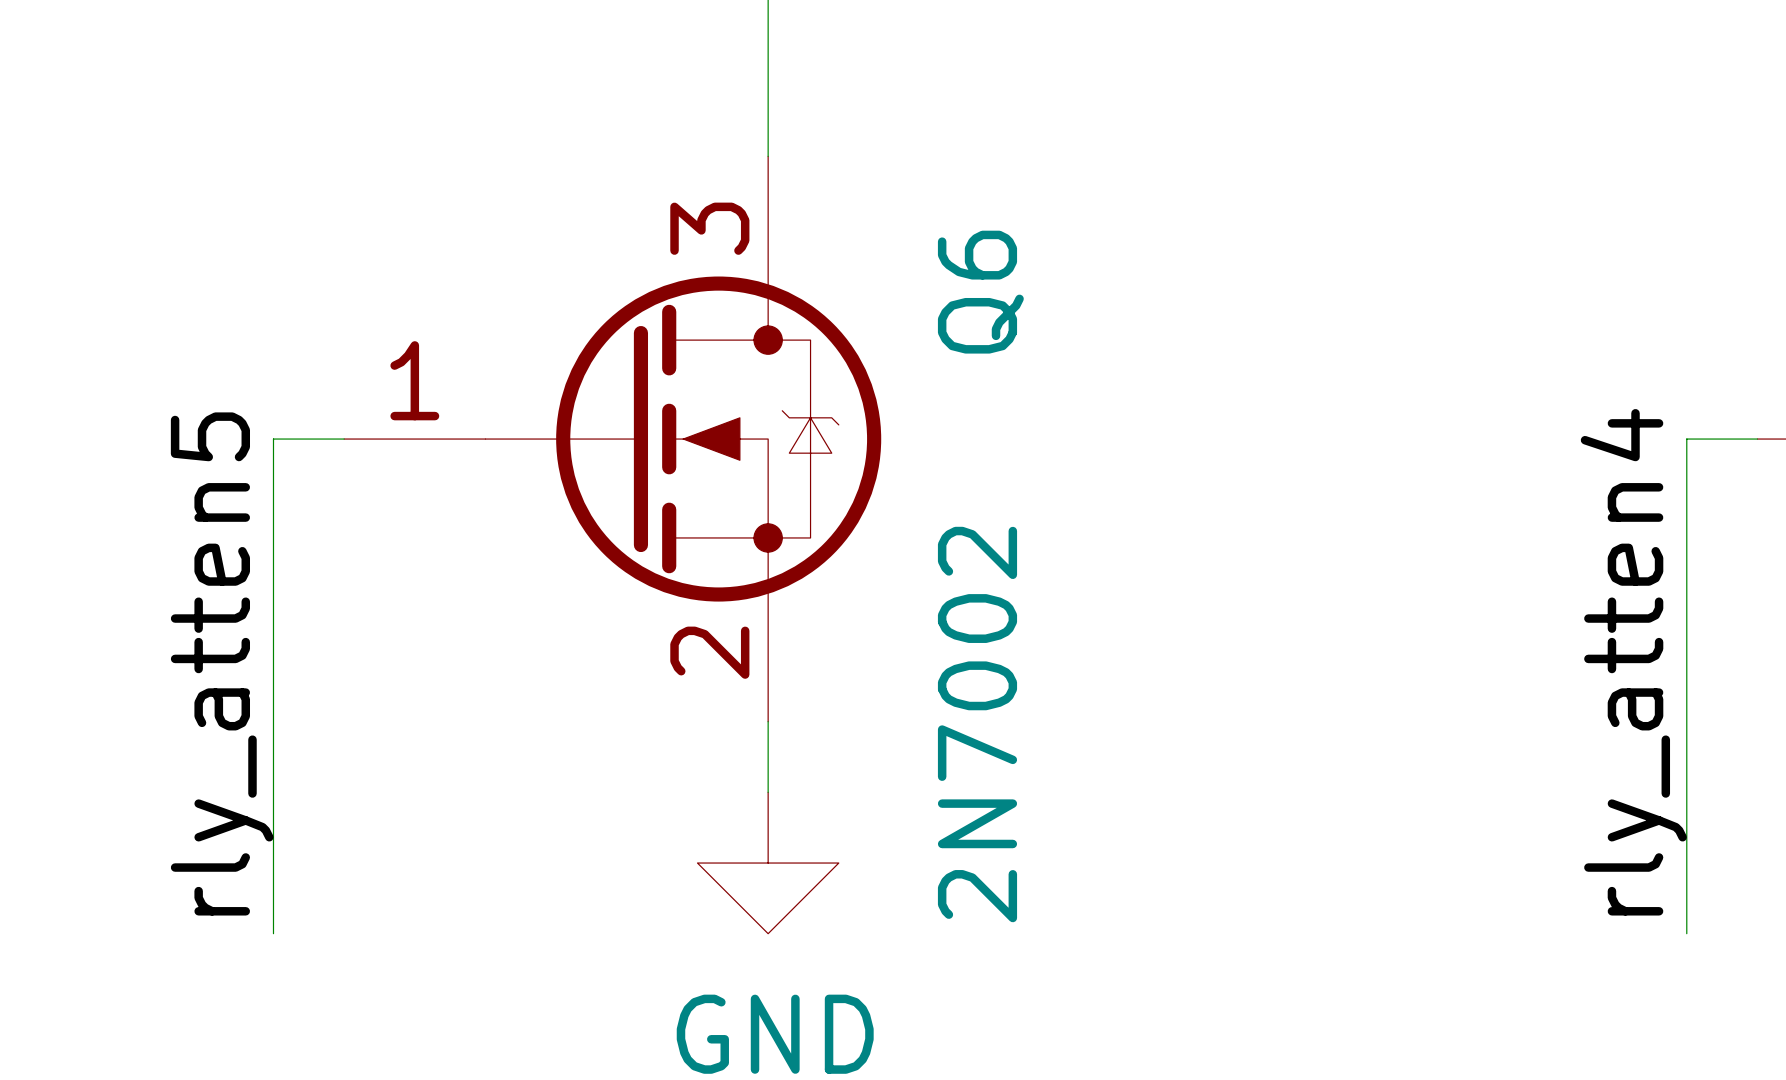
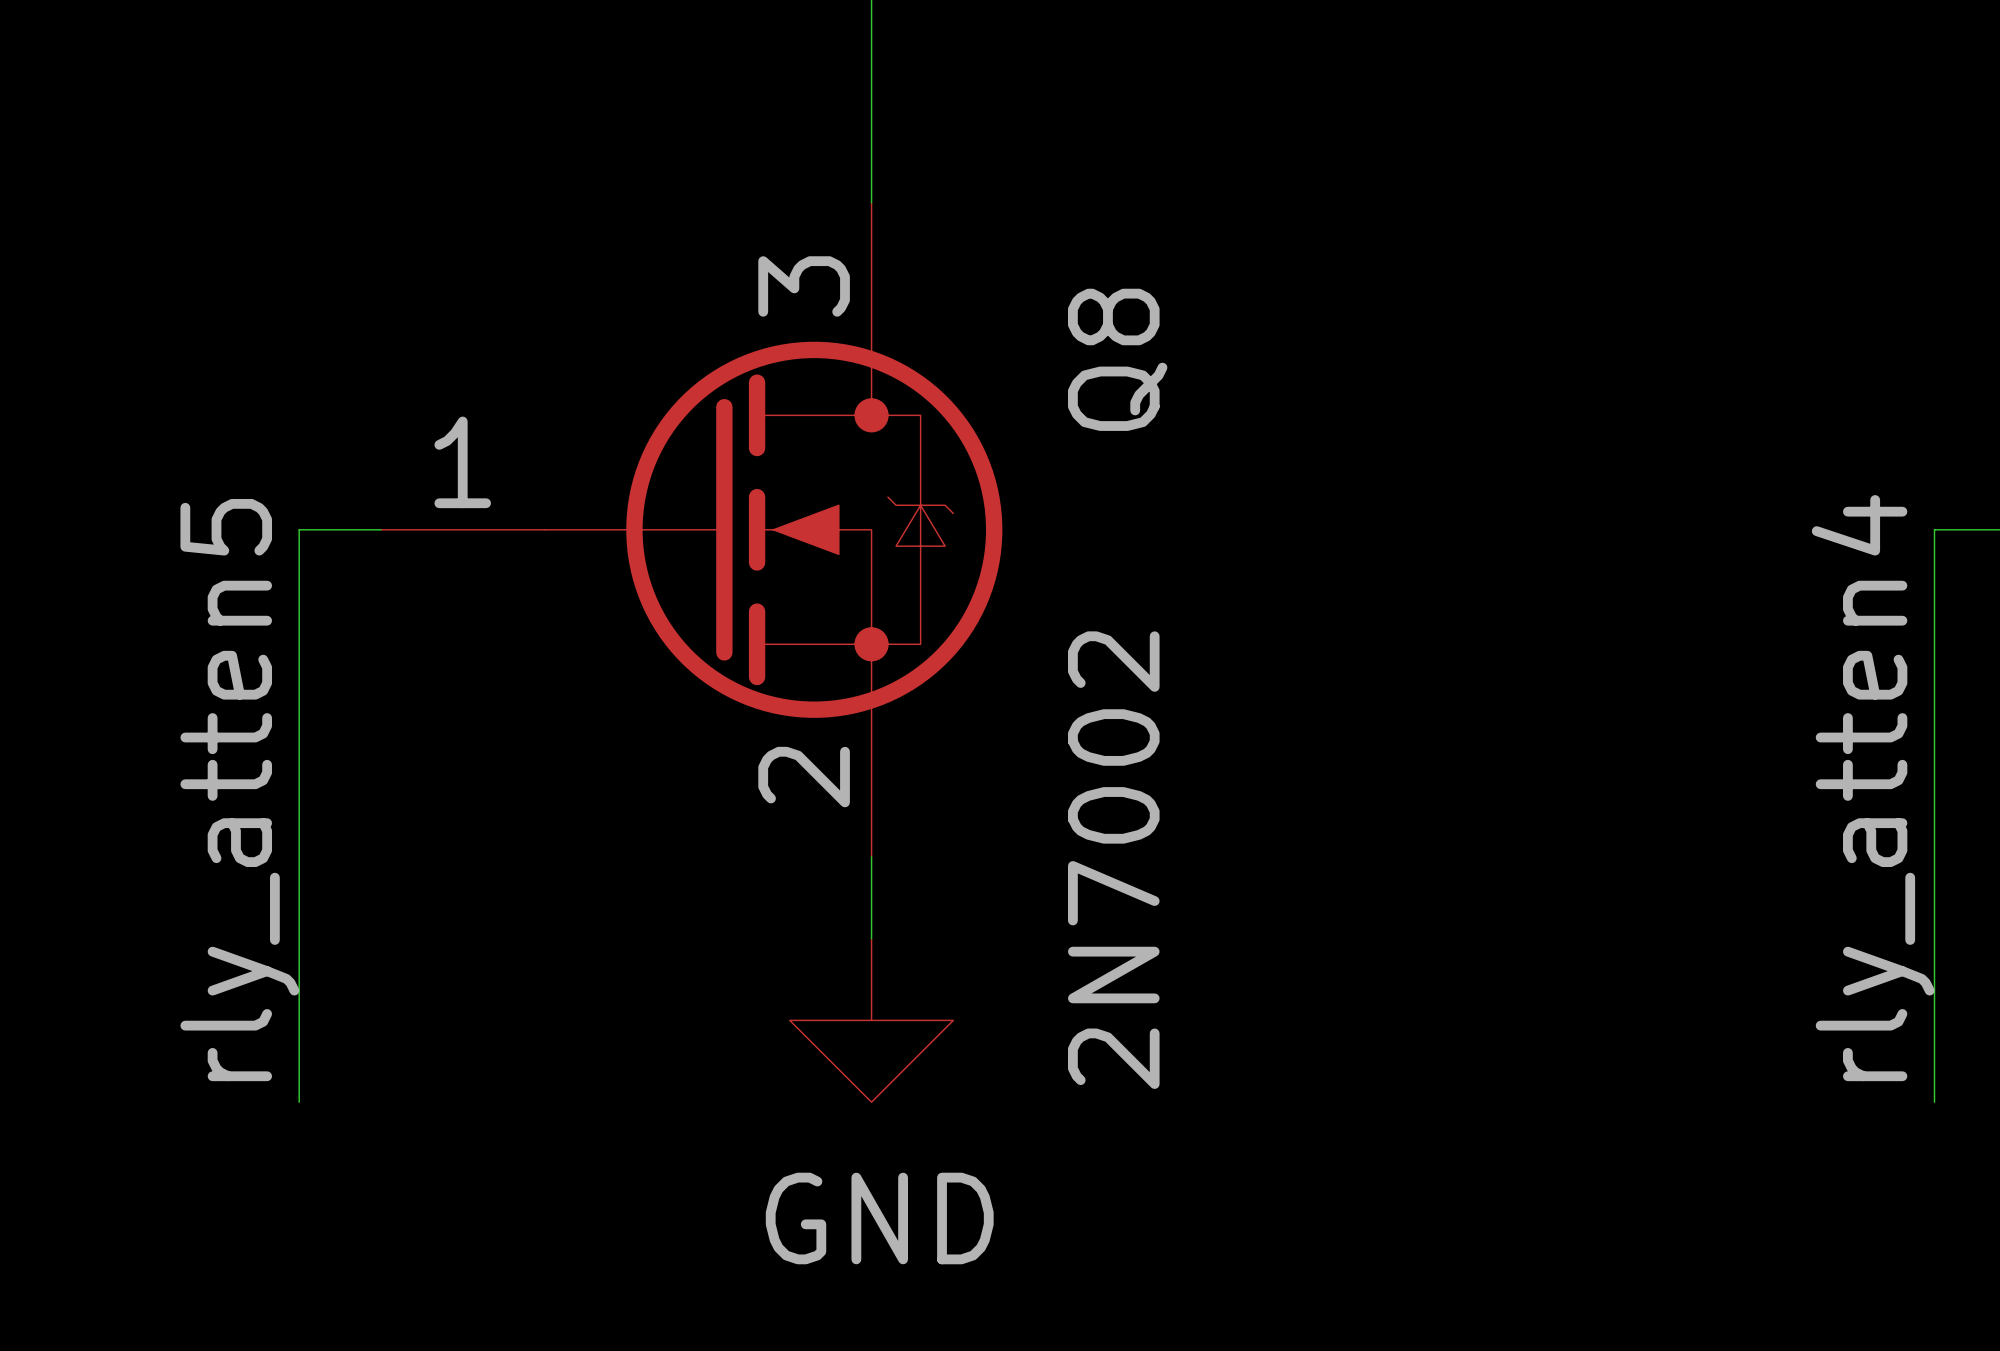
Q6 name: Q6 (980, 292) -> Q8 (1117, 359)

